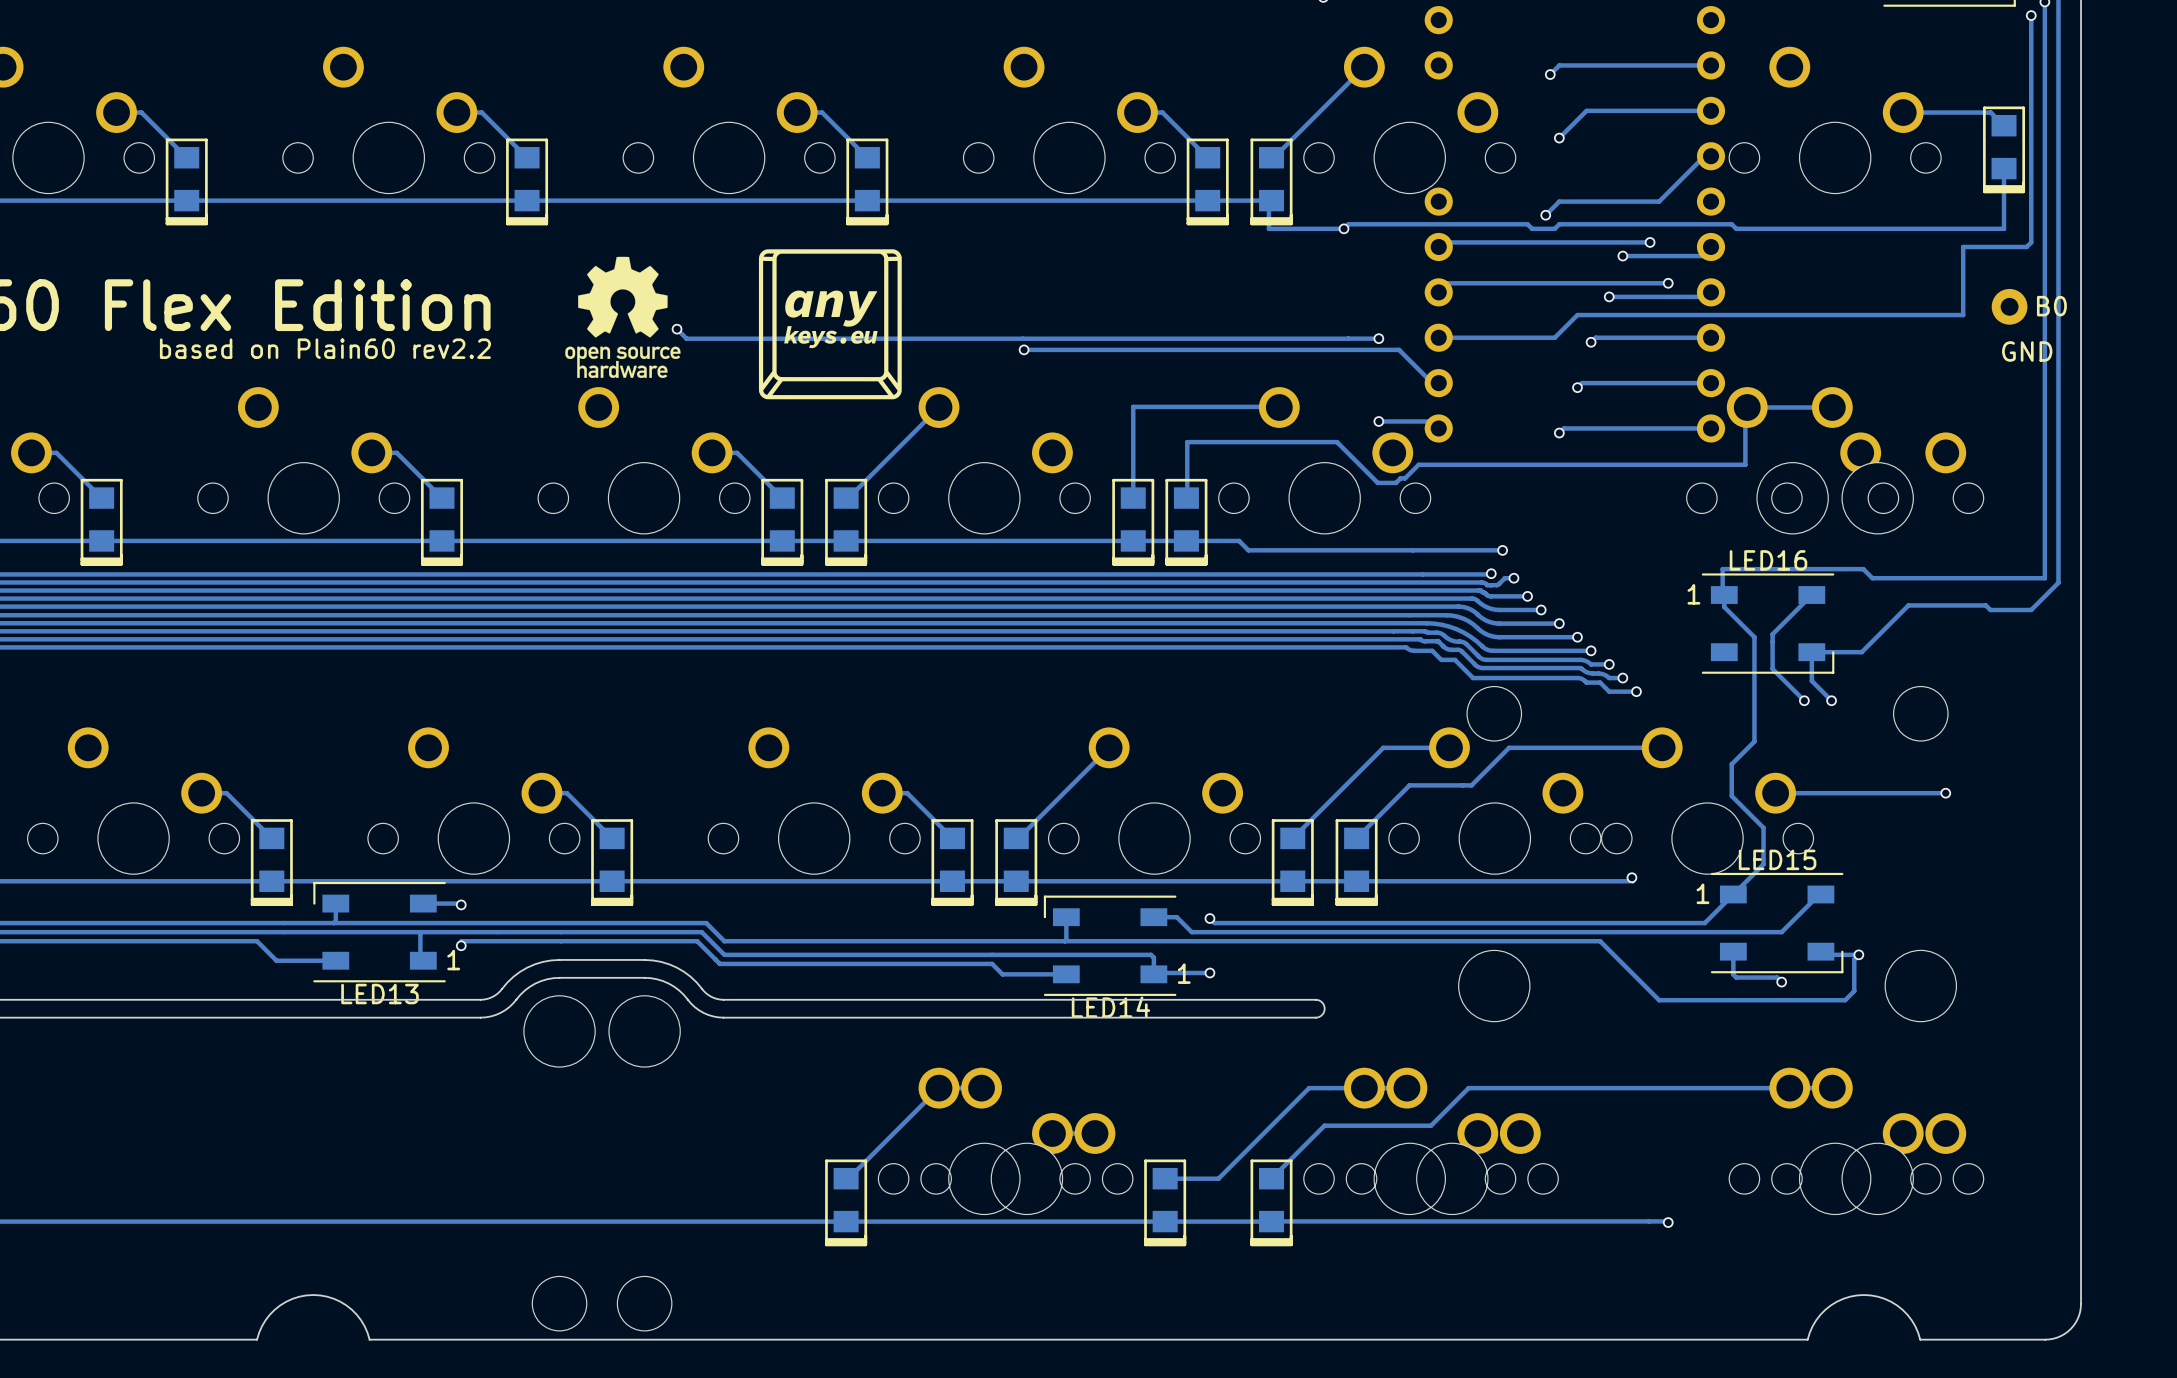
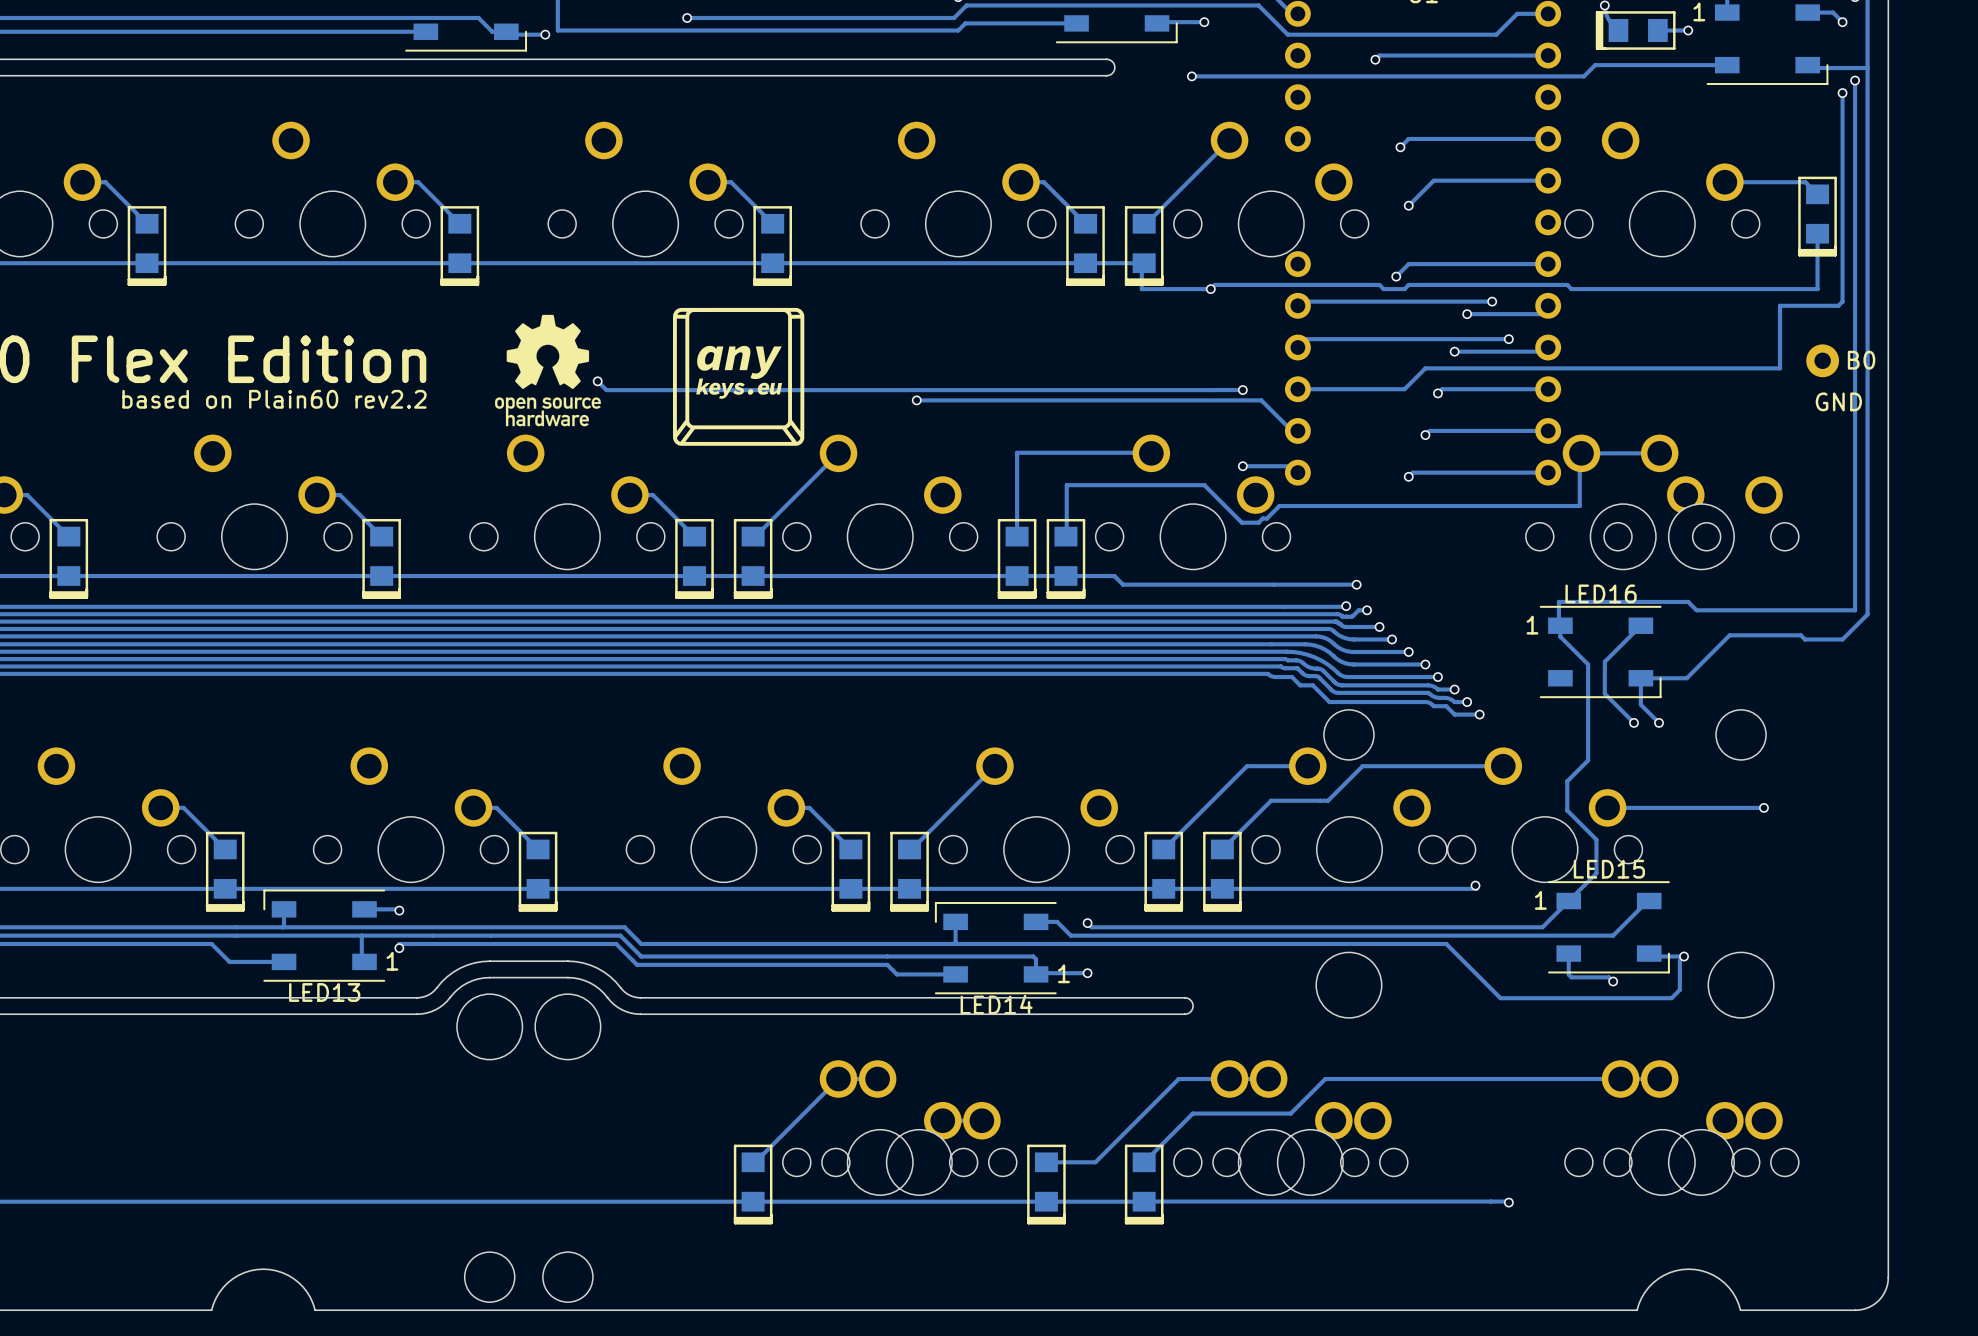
track: (1710, 156) (1704, 156) (1659, 201) -> (1548, 264) (1500, 264)

